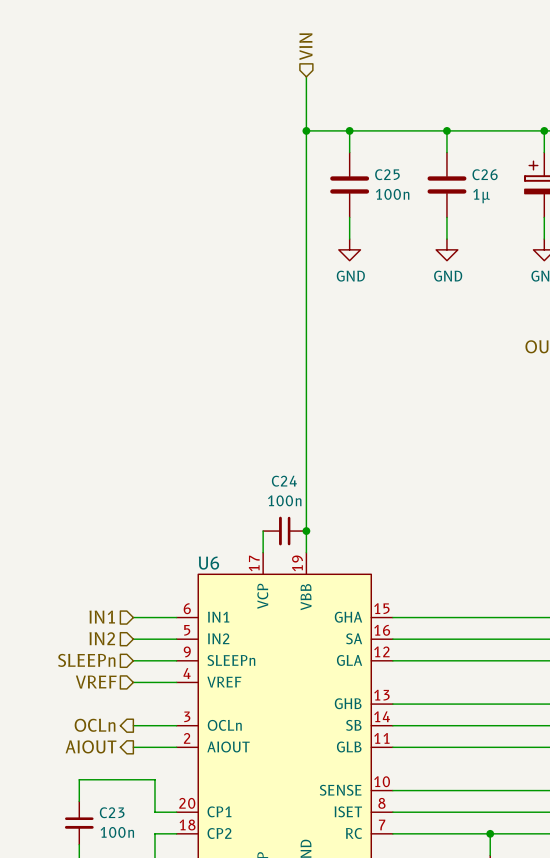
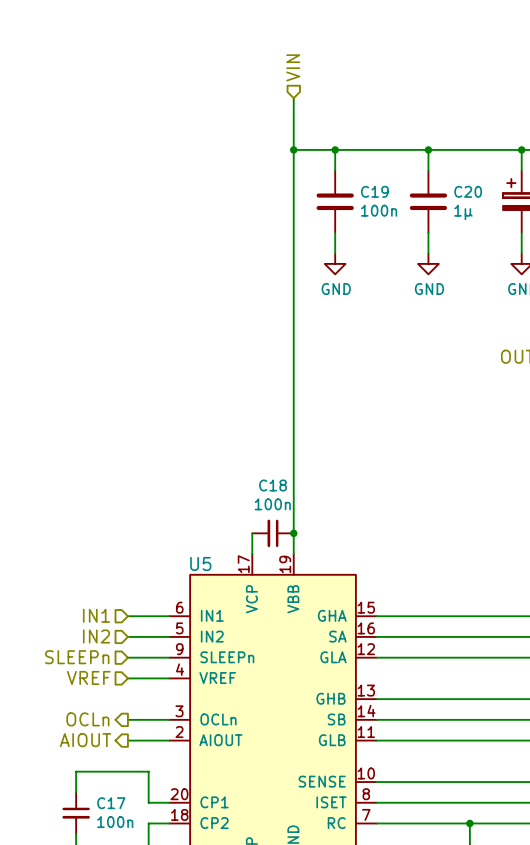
C25 name: C25 (387, 174) -> C19 (374, 191)
C26 name: C26 (485, 174) -> C20 (468, 191)
C24 name: C24 (284, 481) -> C18 (273, 485)
U6 name: U6 (208, 563) -> U5 (200, 563)
C23 name: C23 (112, 812) -> C17 (111, 803)

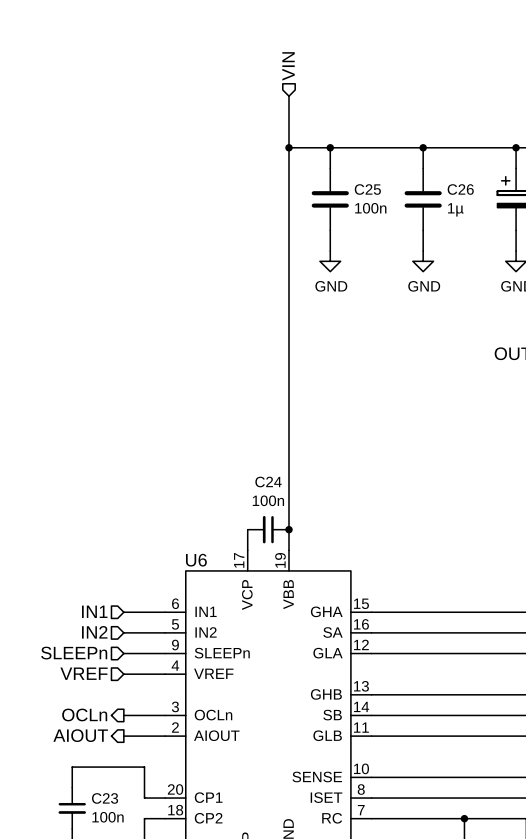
C19 name: C19 (374, 191) -> C25 (367, 189)
C20 name: C20 (468, 191) -> C26 (460, 189)
C18 name: C18 (273, 485) -> C24 (268, 482)
U5 name: U5 (200, 563) -> U6 (196, 560)
C17 name: C17 (111, 803) -> C23 (105, 798)

